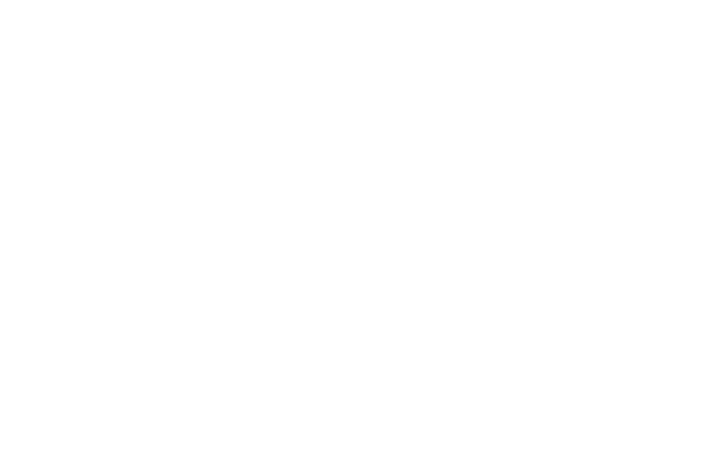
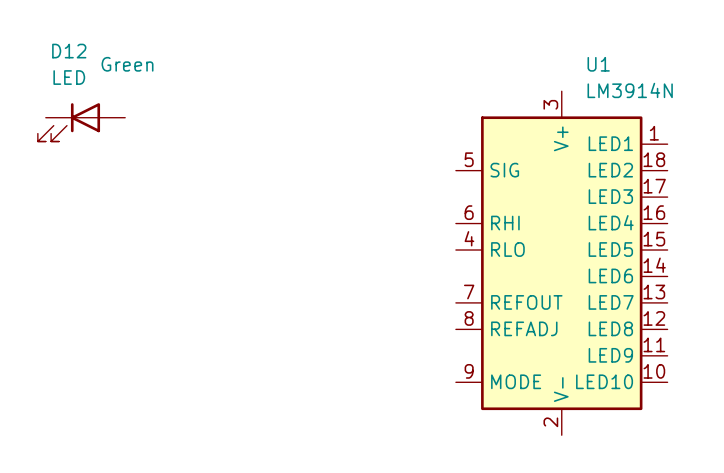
D12: none -> LED (81, 122)
U1: none -> LM3914N (561, 263)

